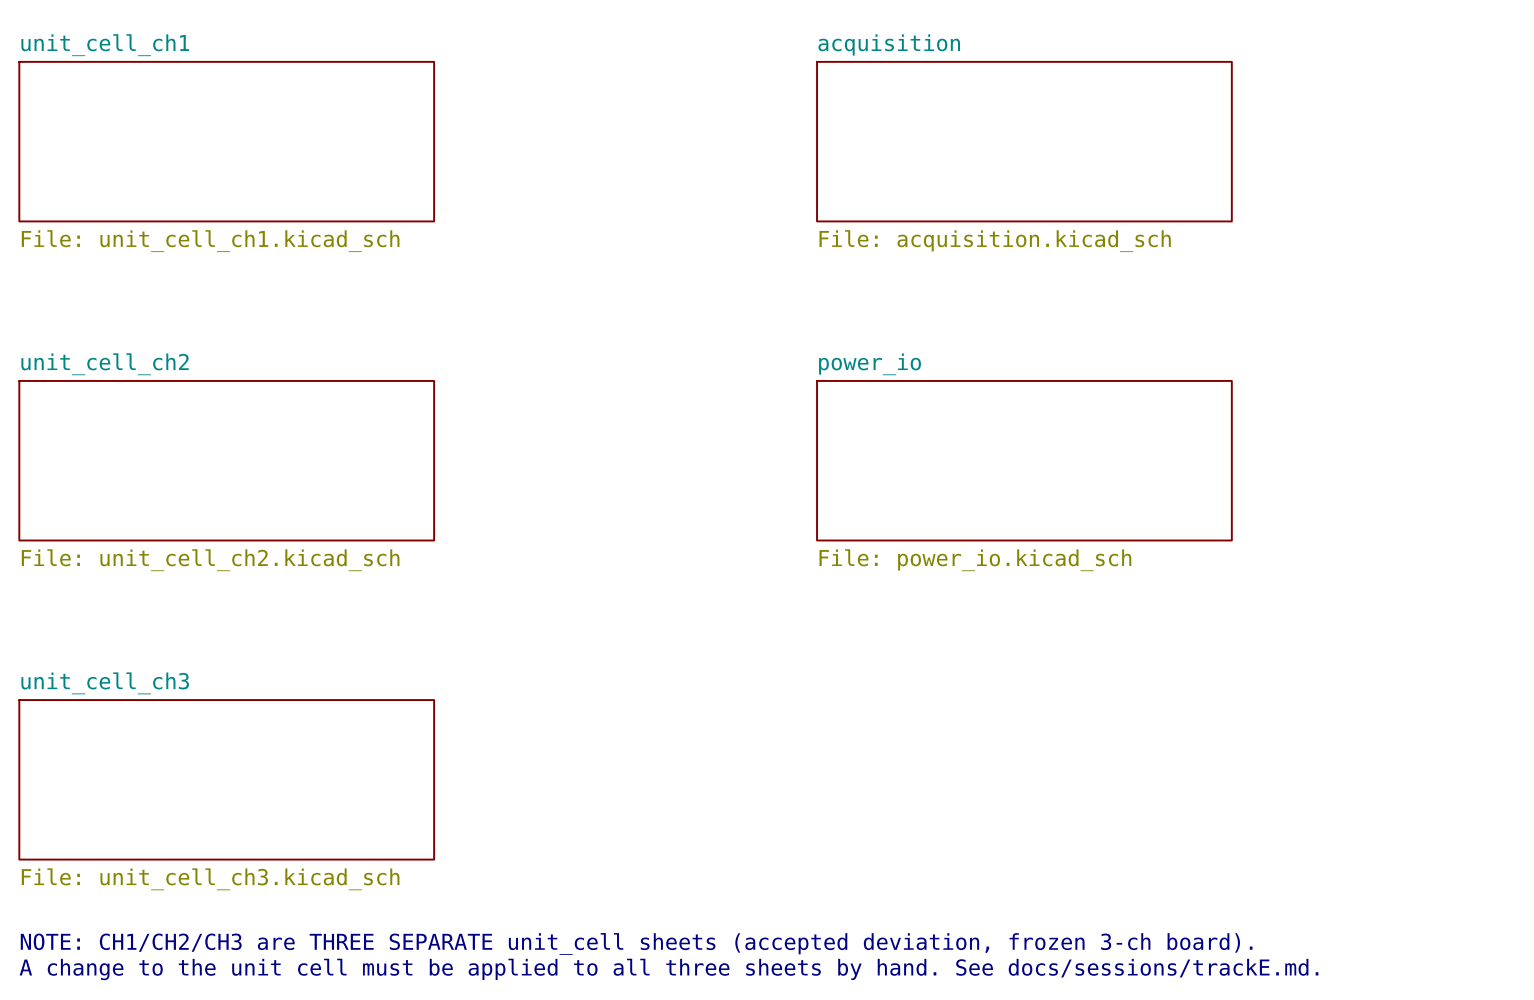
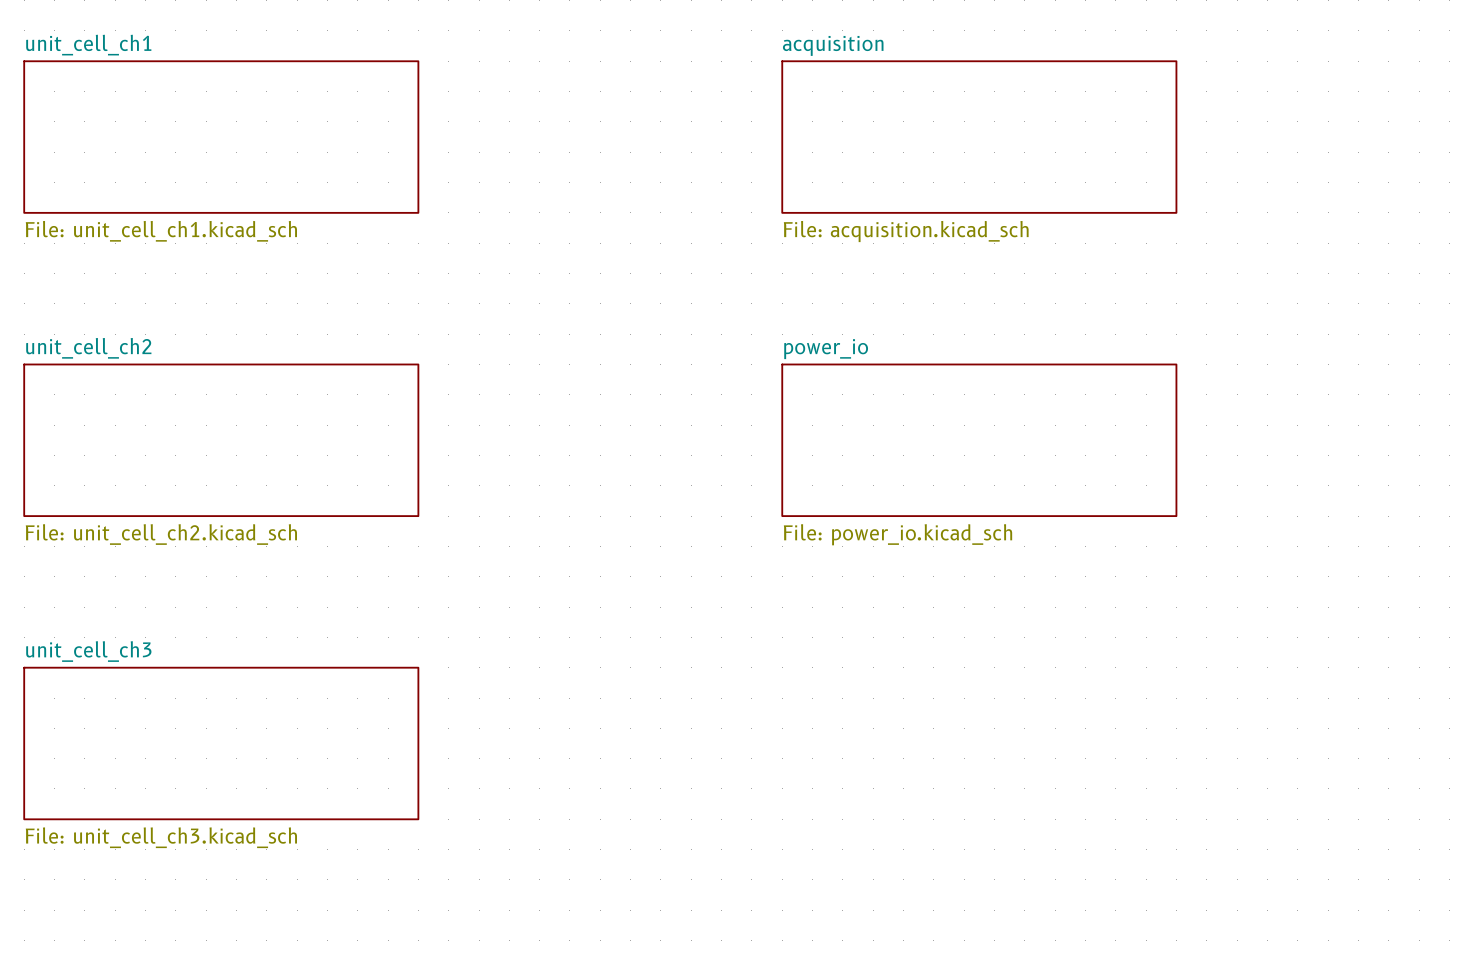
text: NOTE: CH1/CH2/CH3 are THREE SEPARATE unit_cell sheets (accepted deviation, frozen 3-ch board). (636, 944) -> none
text: A change to the unit cell must be applied to all three sheets by hand. See docs/sessions/trackE.md. (669, 969) -> none

